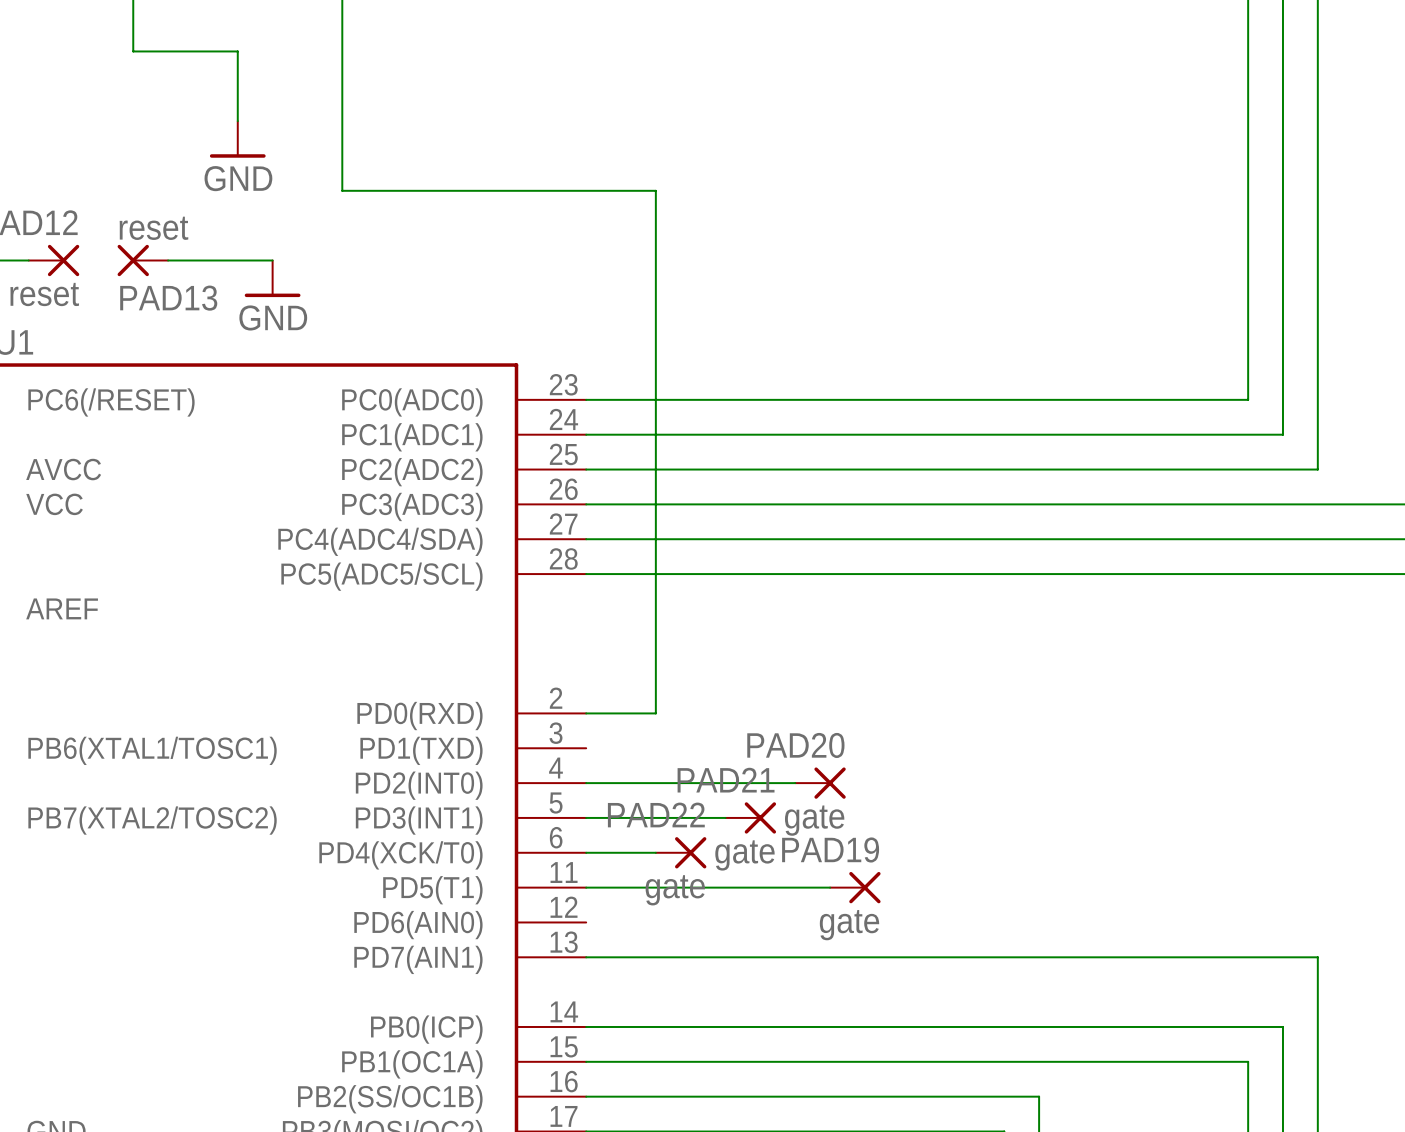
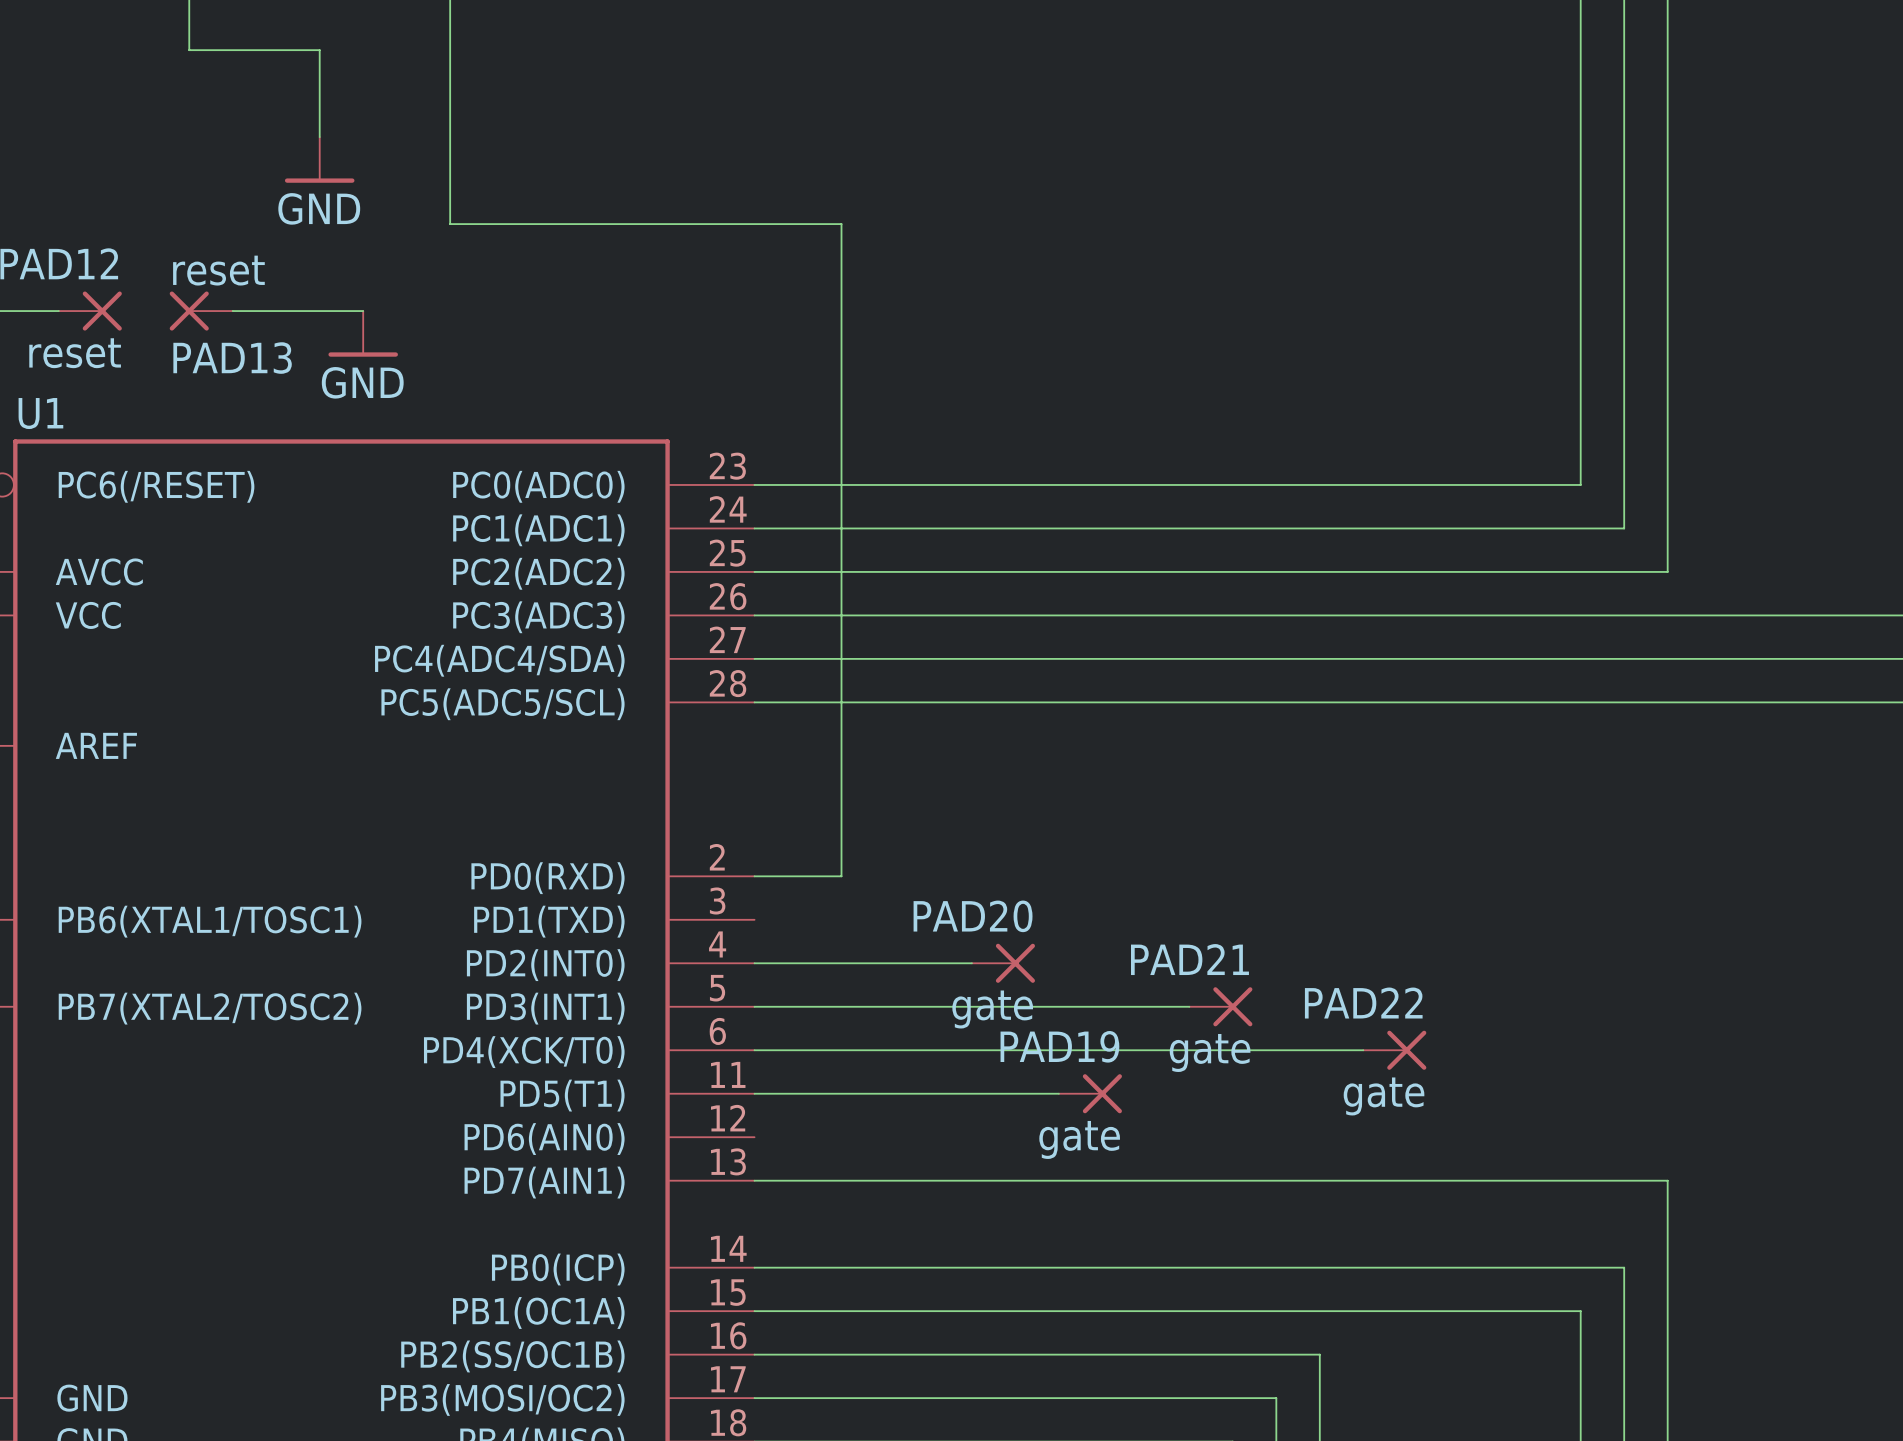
PAD20 position: (820, 783) -> (1003, 963)
wire: none -> (928, 1006) (1189, 1006)
PAD21 position: (750, 817) -> (1220, 1006)
wire: none -> (841, 1050) (1363, 1050)
PAD22 position: (681, 852) -> (1394, 1050)

